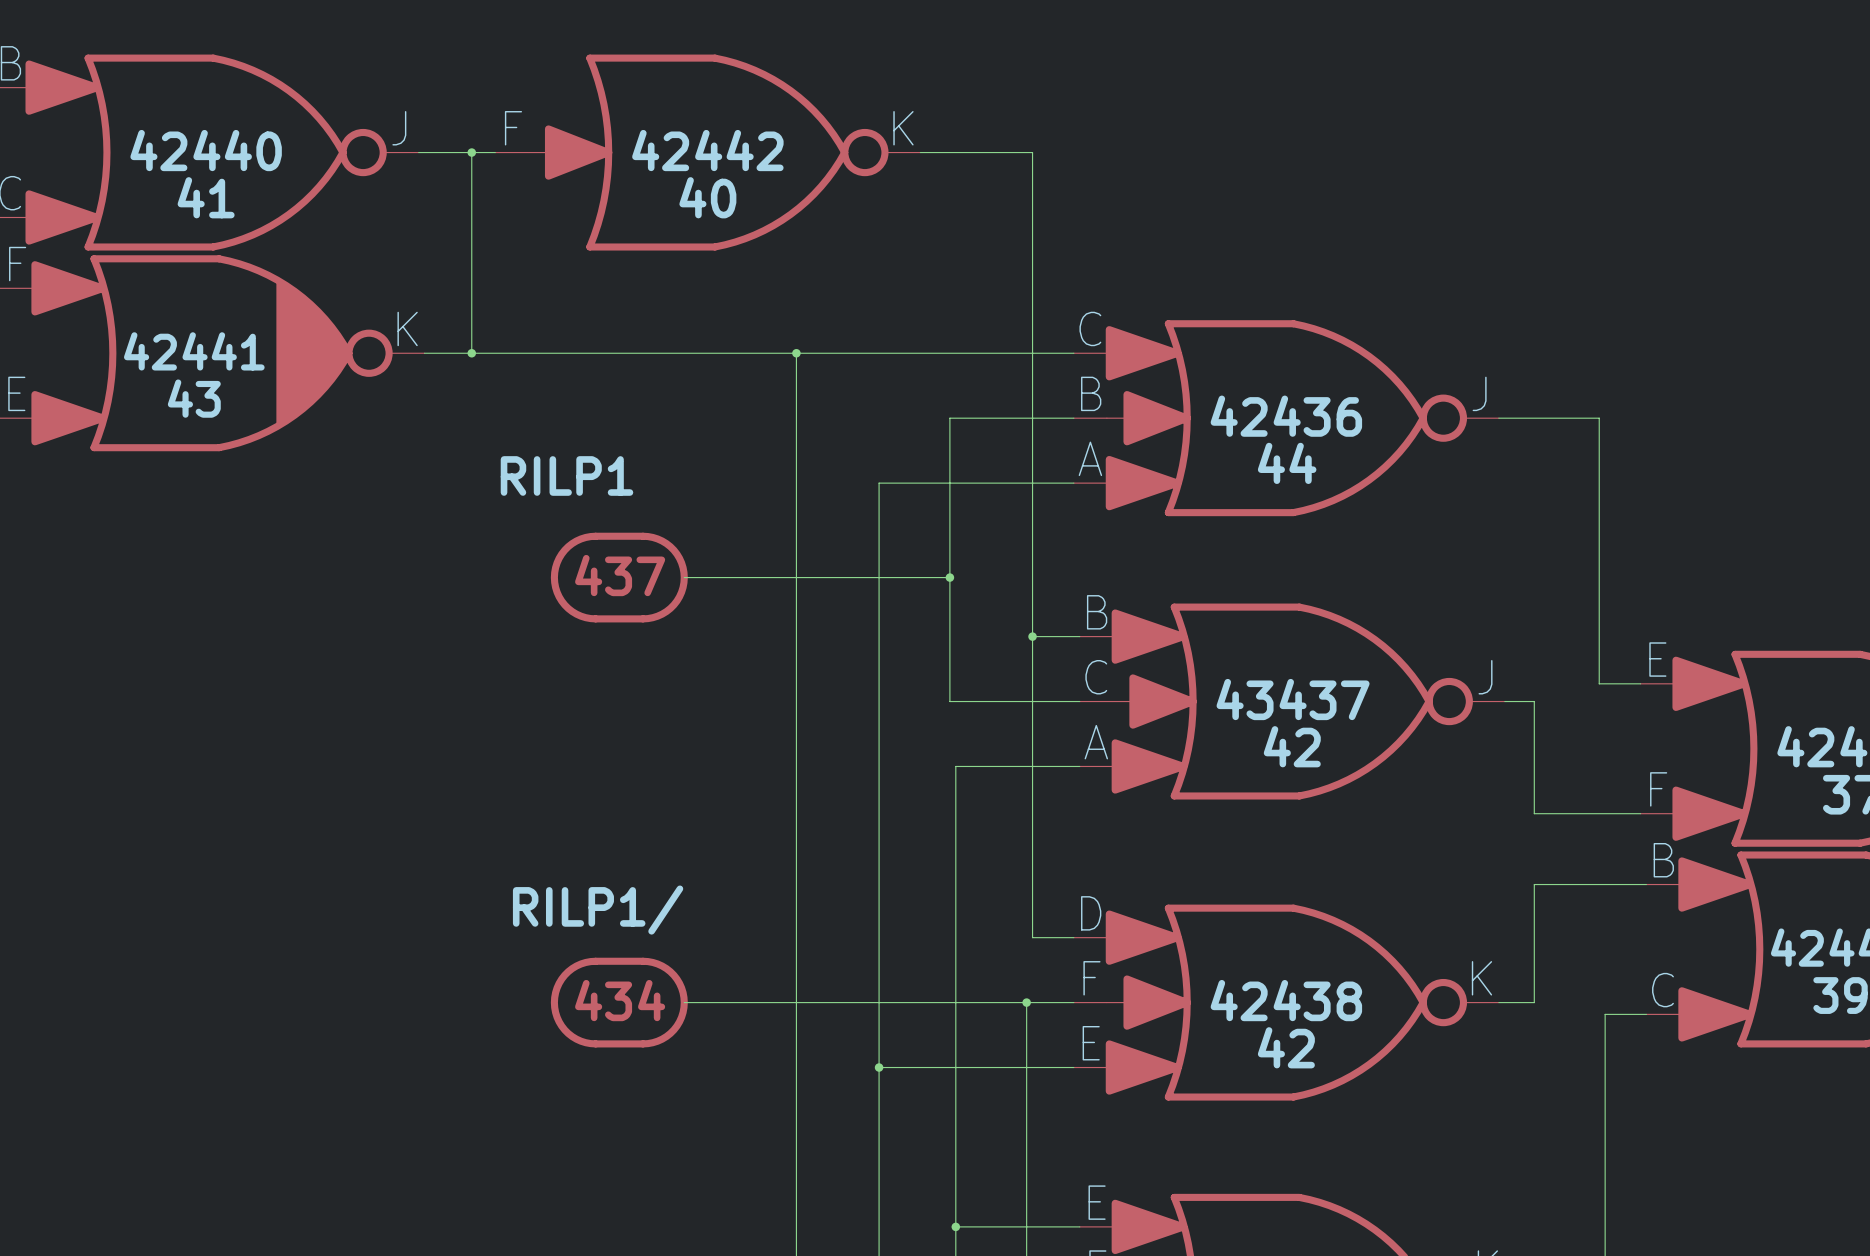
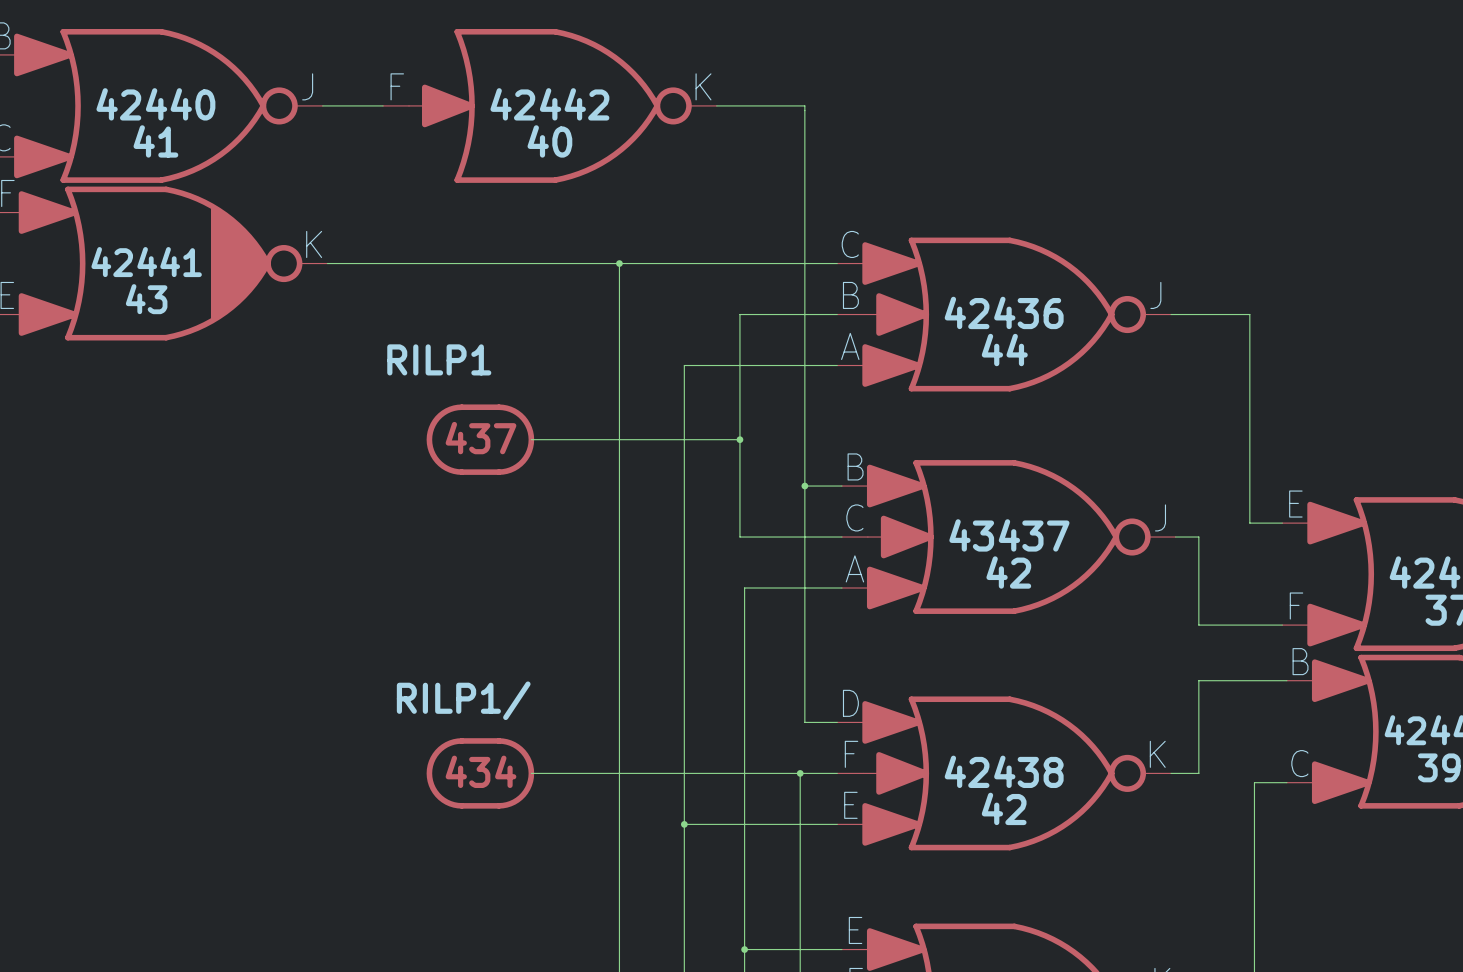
wire: (471, 152) (471, 353) -> none
junction: (471, 152) -> none
junction: (471, 353) -> none

